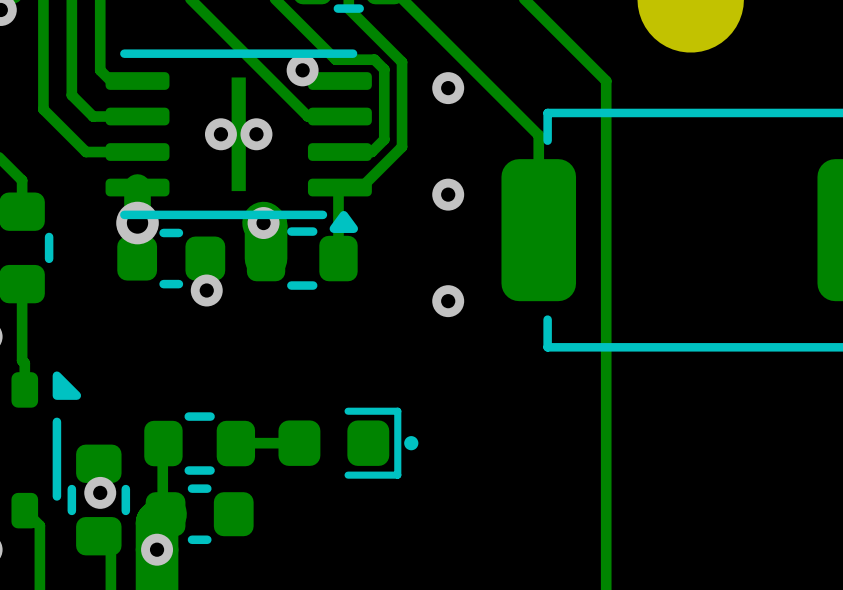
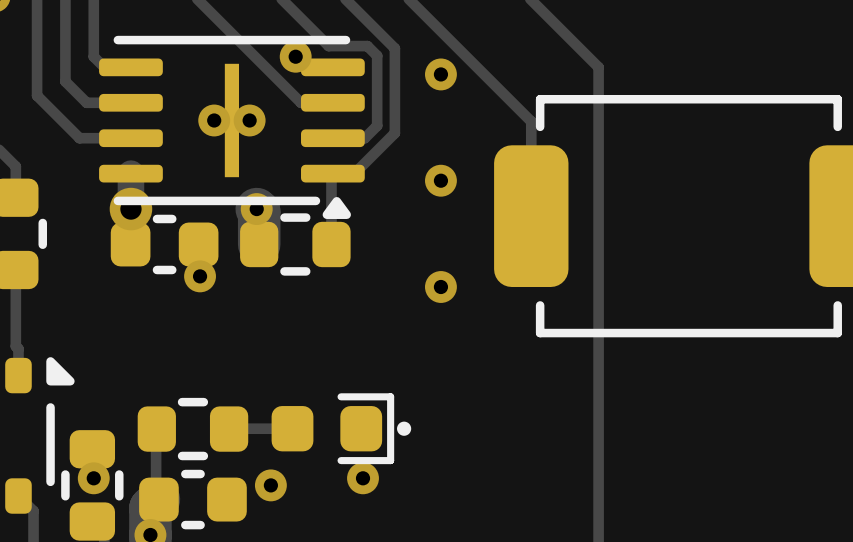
via: none -> (363, 478)
via: none -> (270, 485)

